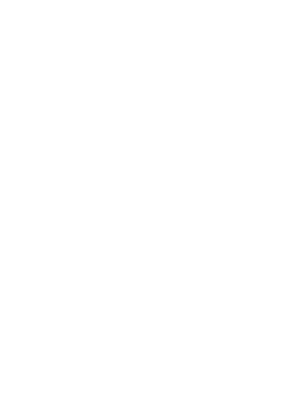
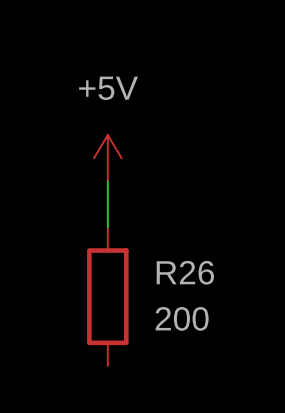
power symbol: none -> +5V (107, 158)
wire: none -> (107, 181) (107, 227)
R26: none -> 200 (107, 296)

